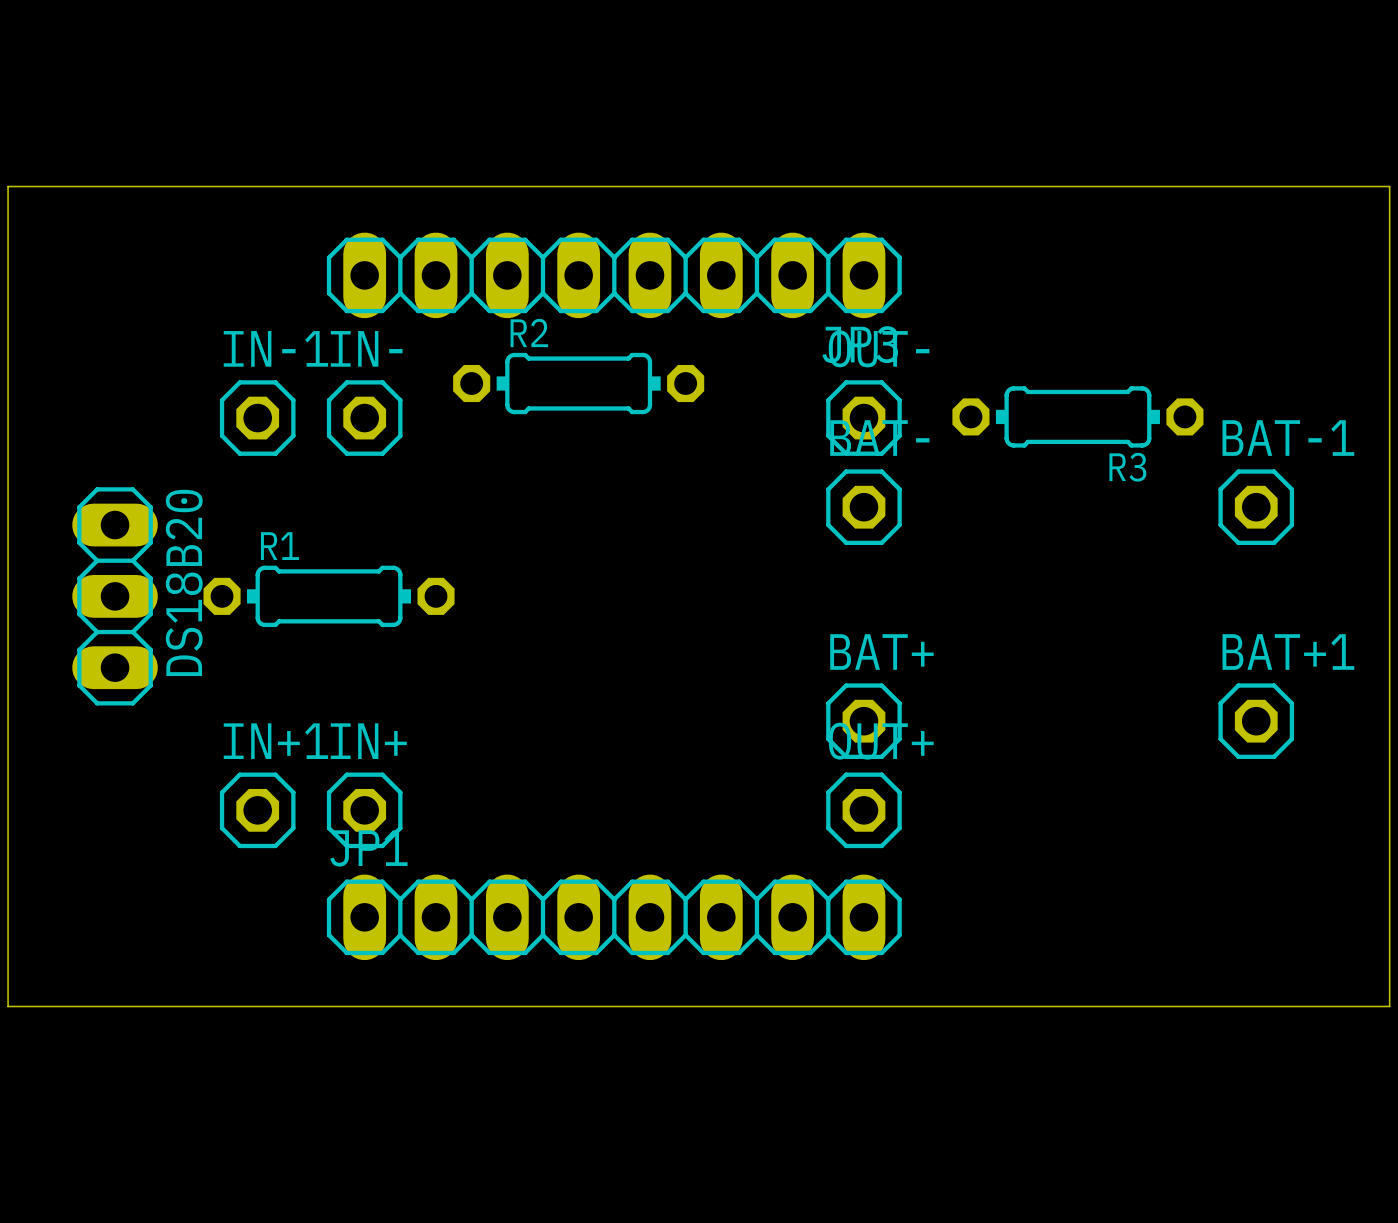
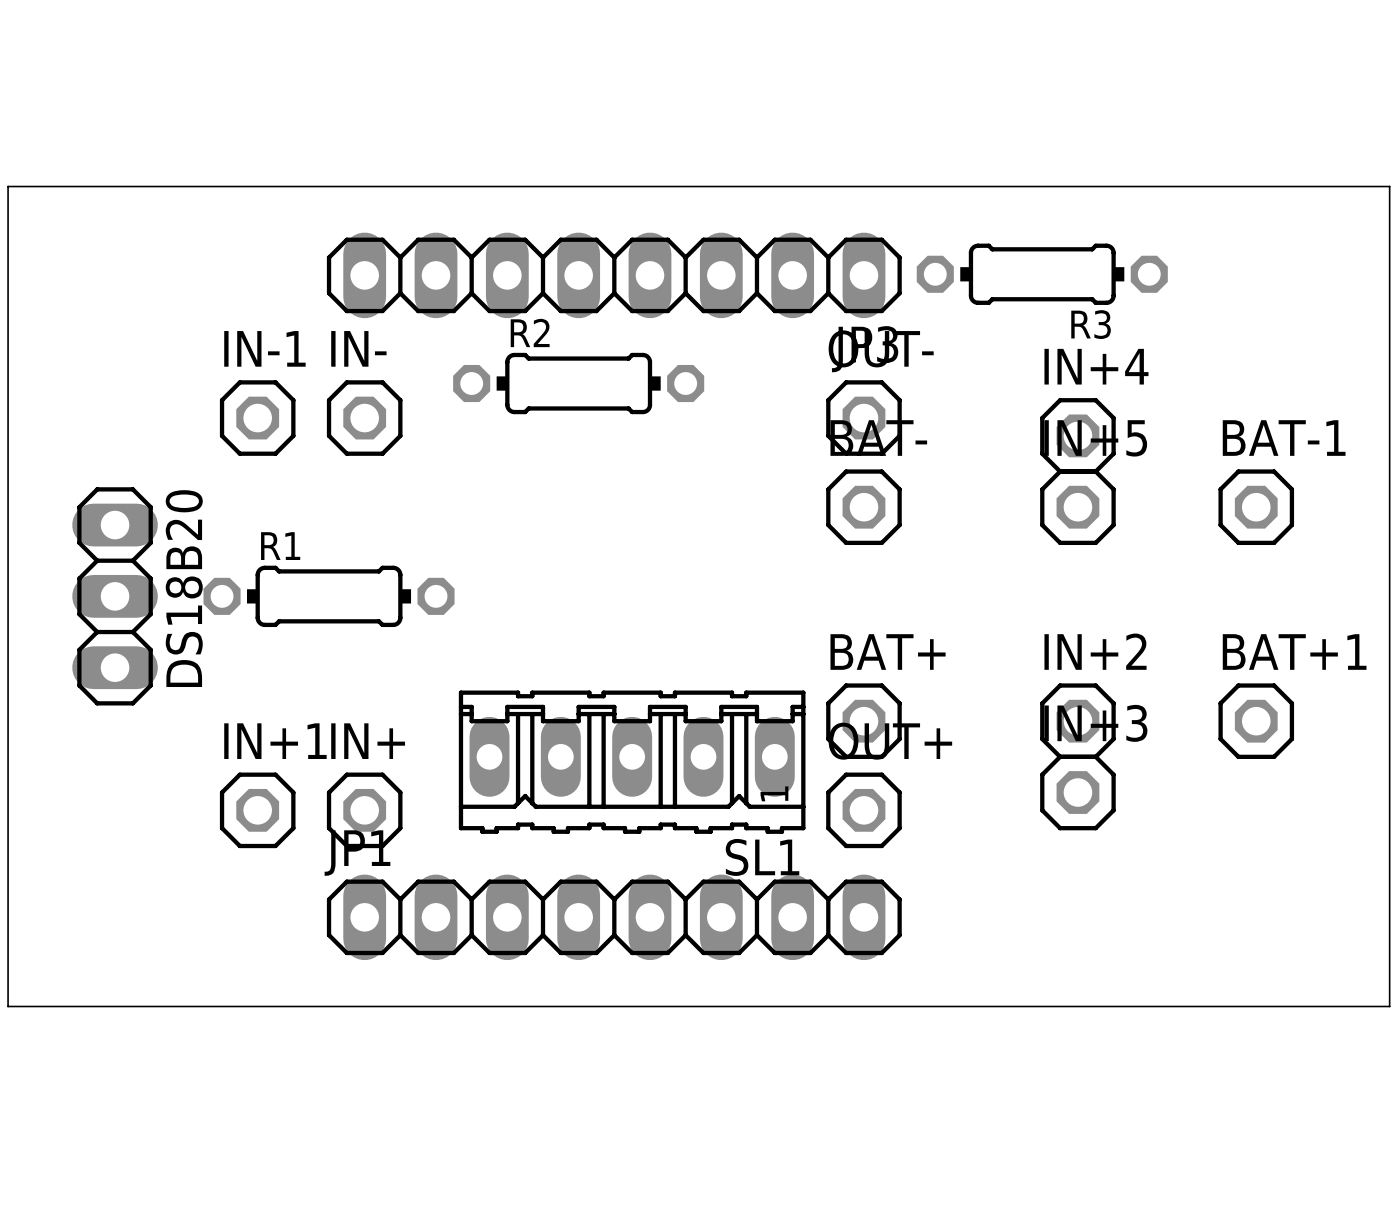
R3 position: (1077, 416) -> (1042, 274)
IN+4: none -> (1077, 435)
IN+5: none -> (1077, 507)
IN+2: none -> (1077, 721)
SL1: none -> (632, 762)
IN+3: none -> (1077, 792)

